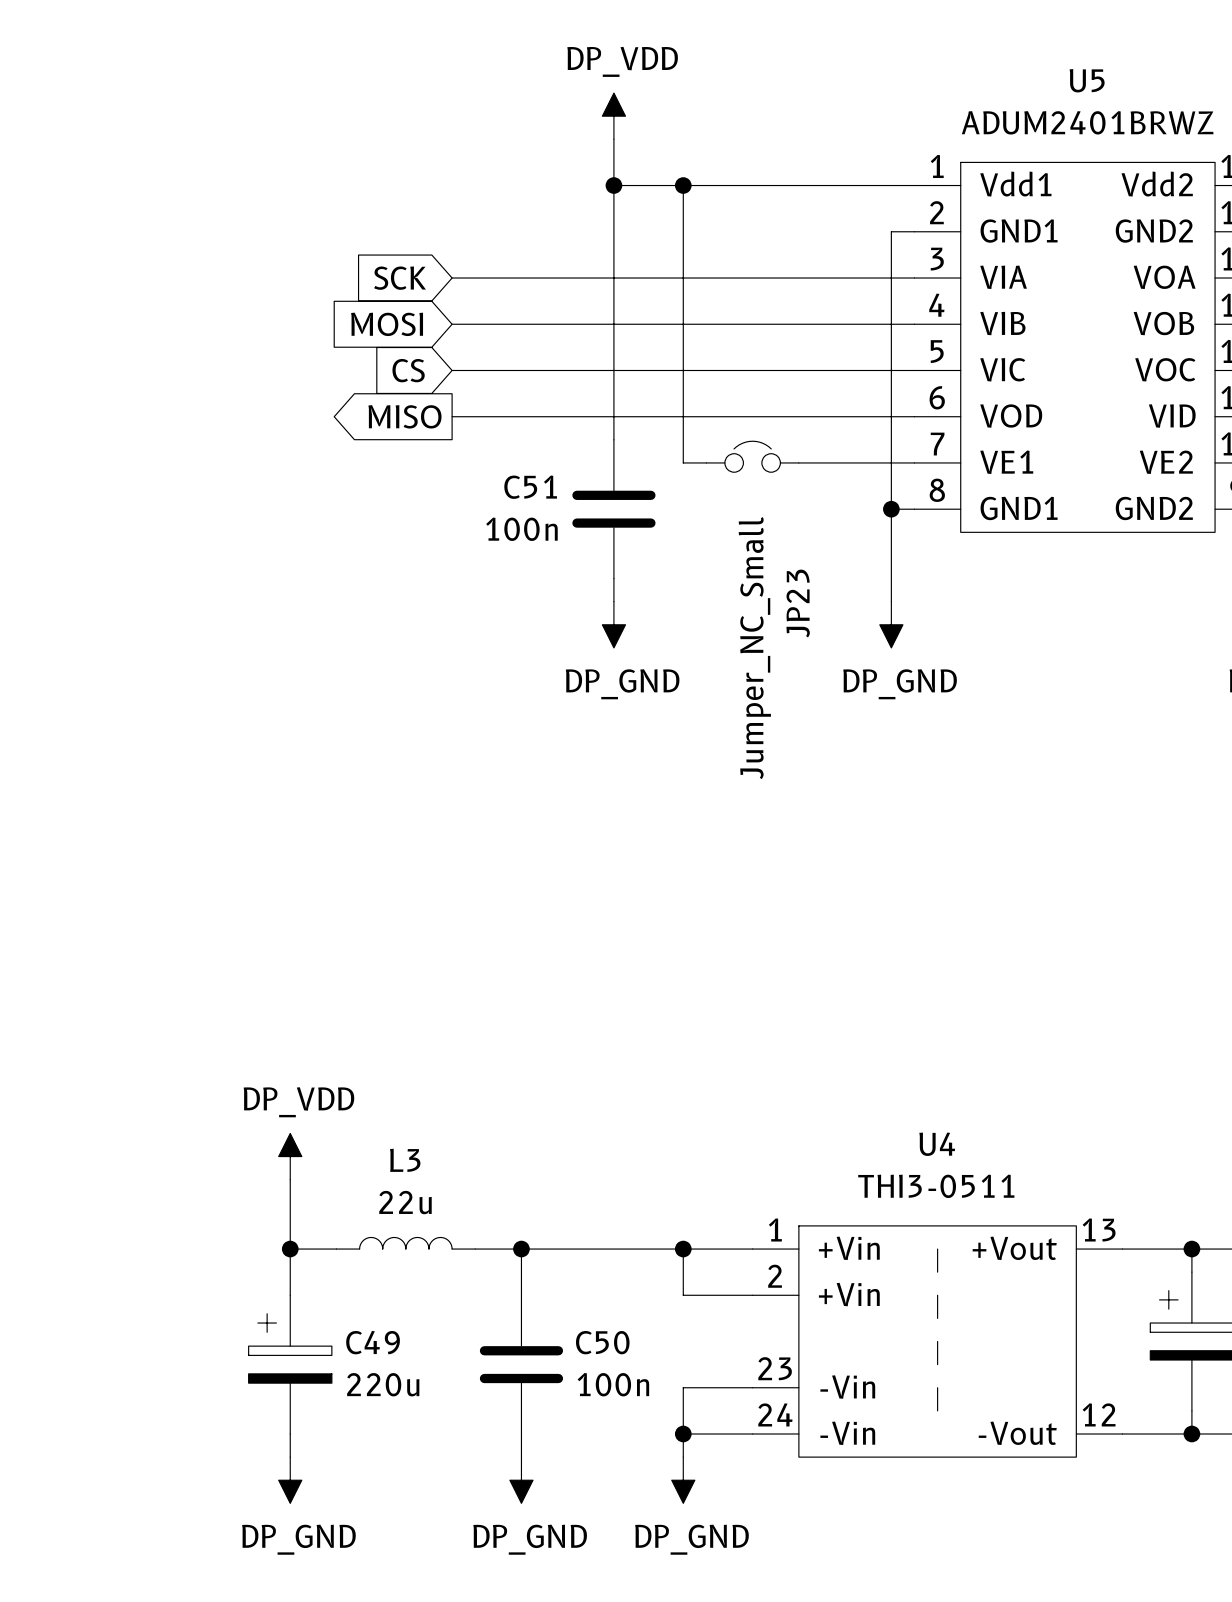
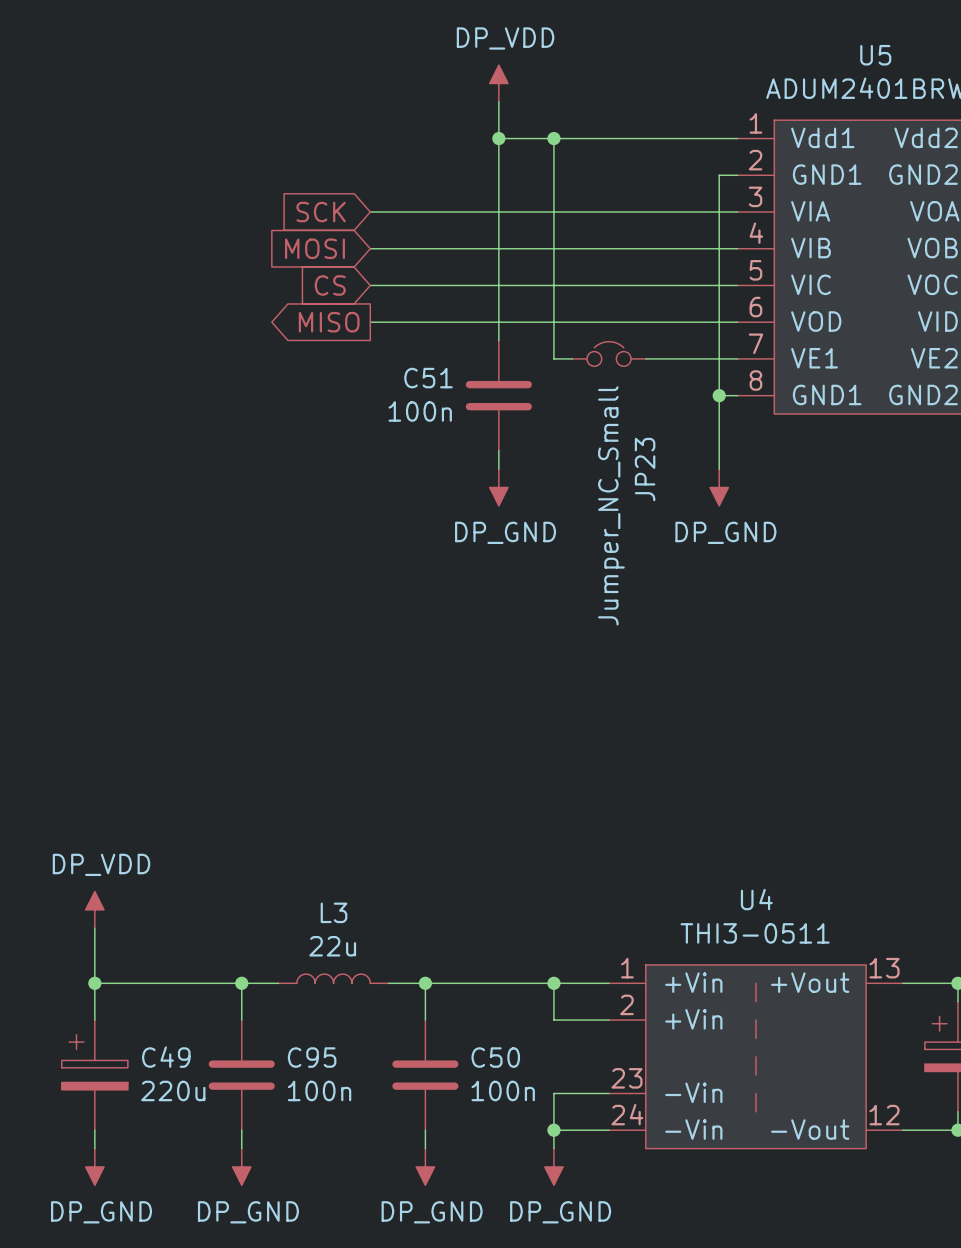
power symbol position: DP_VDD (290, 1156) -> DP_VDD (94, 909)
wire: none -> (94, 928) (94, 1020)
wire: (290, 1179) (290, 1249) -> (94, 983) (241, 983)
junction: none -> (94, 983)
C49 position: (290, 1364) -> (94, 1075)
C95: none -> 100n (241, 1075)
wire: none -> (94, 1130) (94, 1148)
power symbol: none -> DP_GND (94, 1166)

